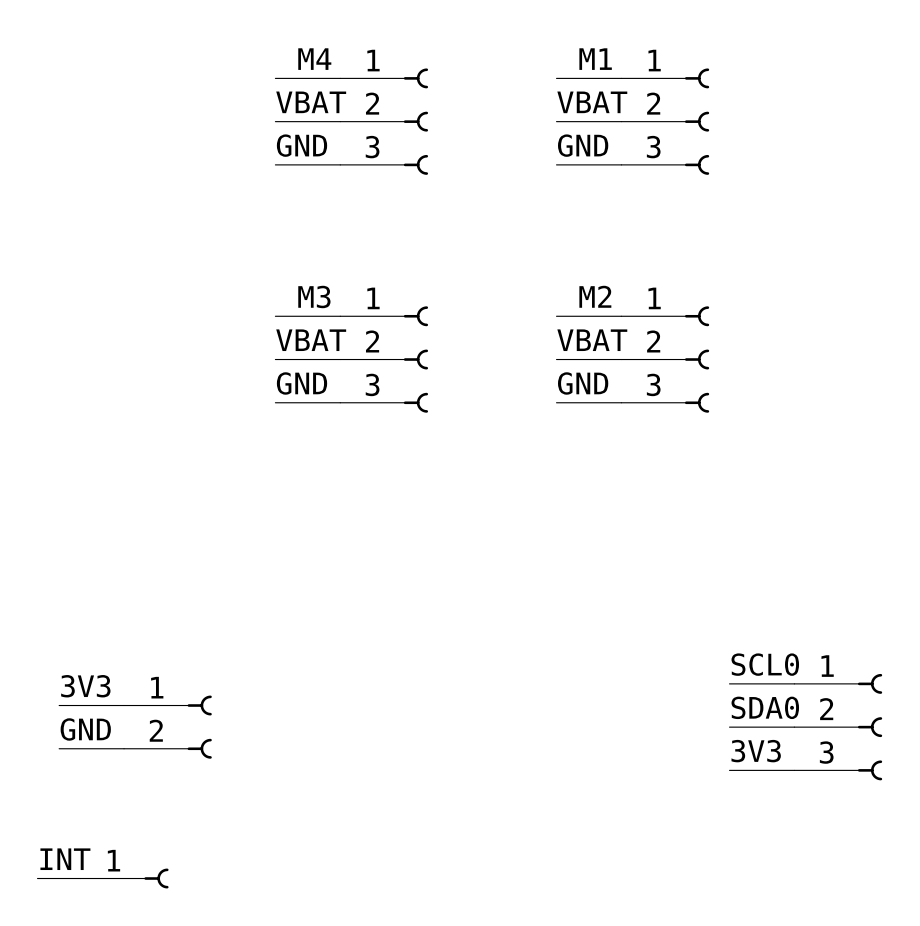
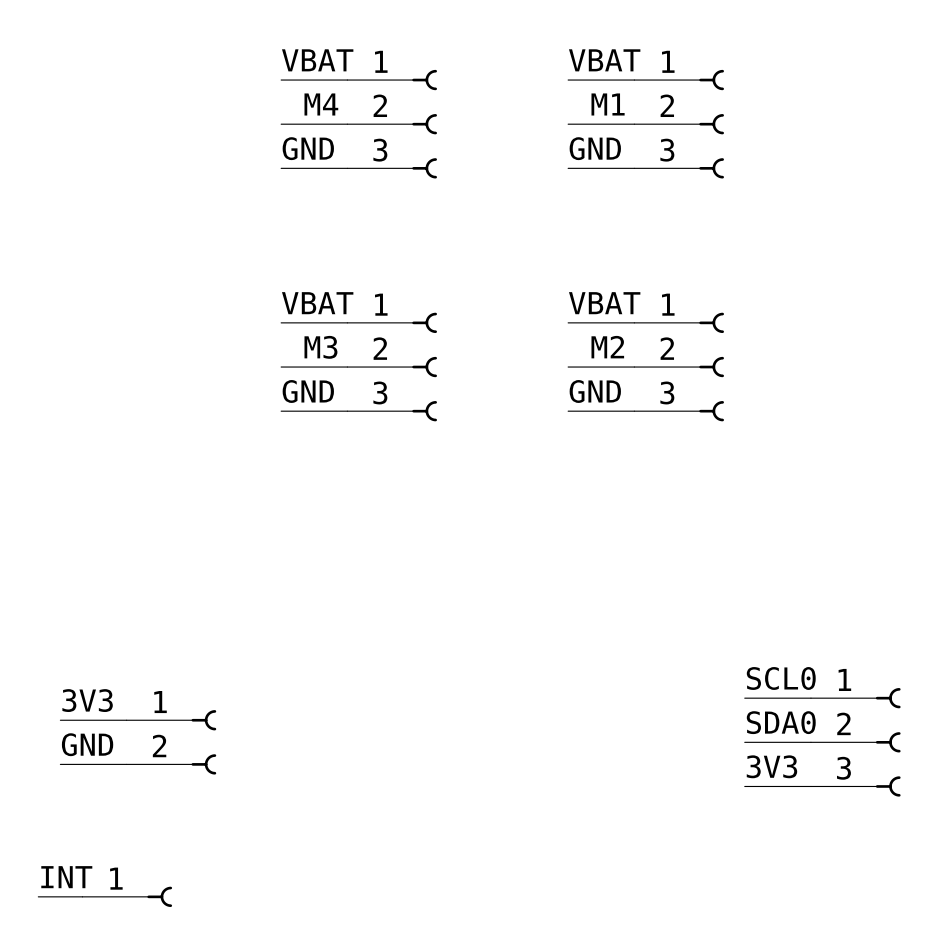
label position: M4 (314, 59) -> M4 (321, 104)
label position: M1 (595, 59) -> M1 (608, 104)
label position: VBAT (311, 102) -> VBAT (317, 60)
label position: VBAT (592, 102) -> VBAT (604, 60)
label position: M3 (314, 296) -> M3 (320, 347)
label position: M2 (595, 296) -> M2 (607, 347)
label position: VBAT (311, 340) -> VBAT (317, 303)
label position: VBAT (592, 340) -> VBAT (604, 303)

